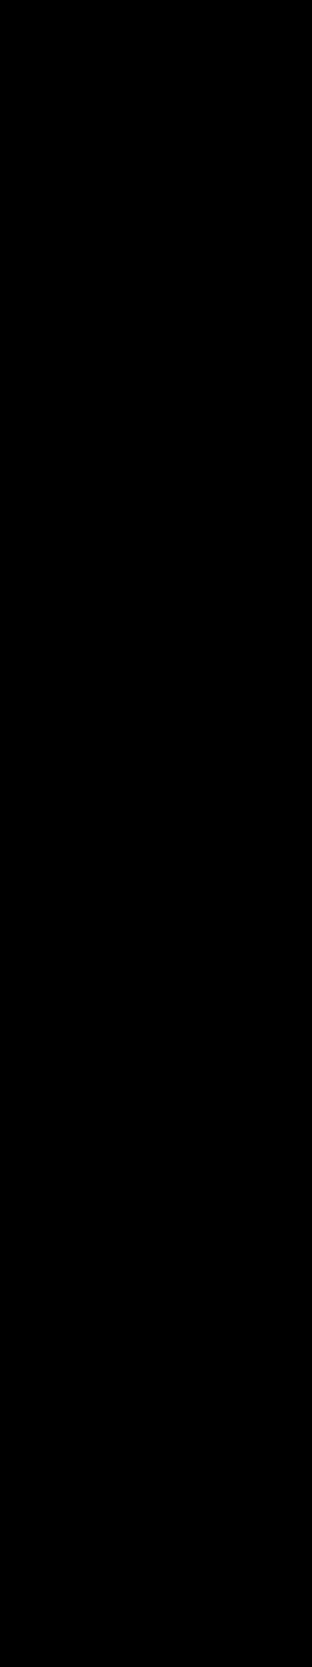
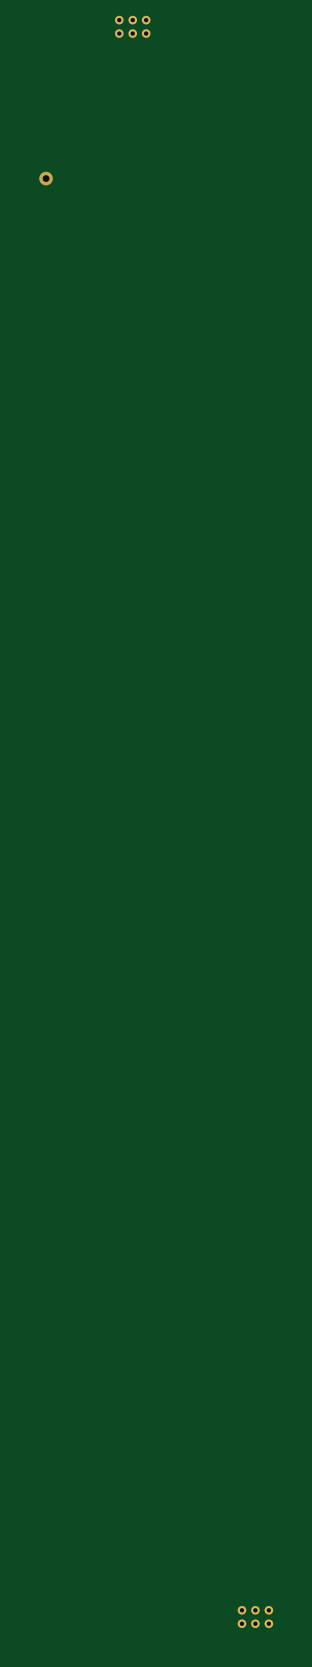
part: none -> (132, 26)
via: none -> (46, 178)
part: none -> (255, 1617)

